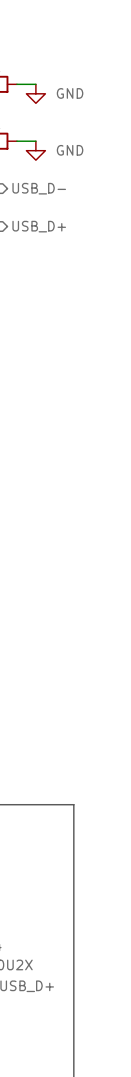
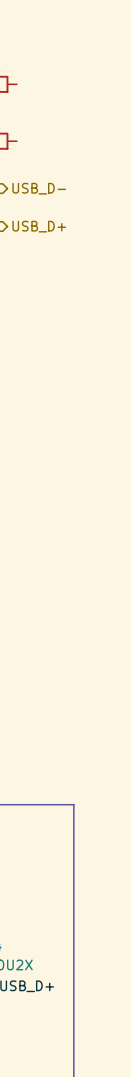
wire: (16, 84) (35, 84) -> none
power symbol: GND (35, 93) -> none
wire: (16, 141) (35, 141) -> none
power symbol: GND (35, 150) -> none

